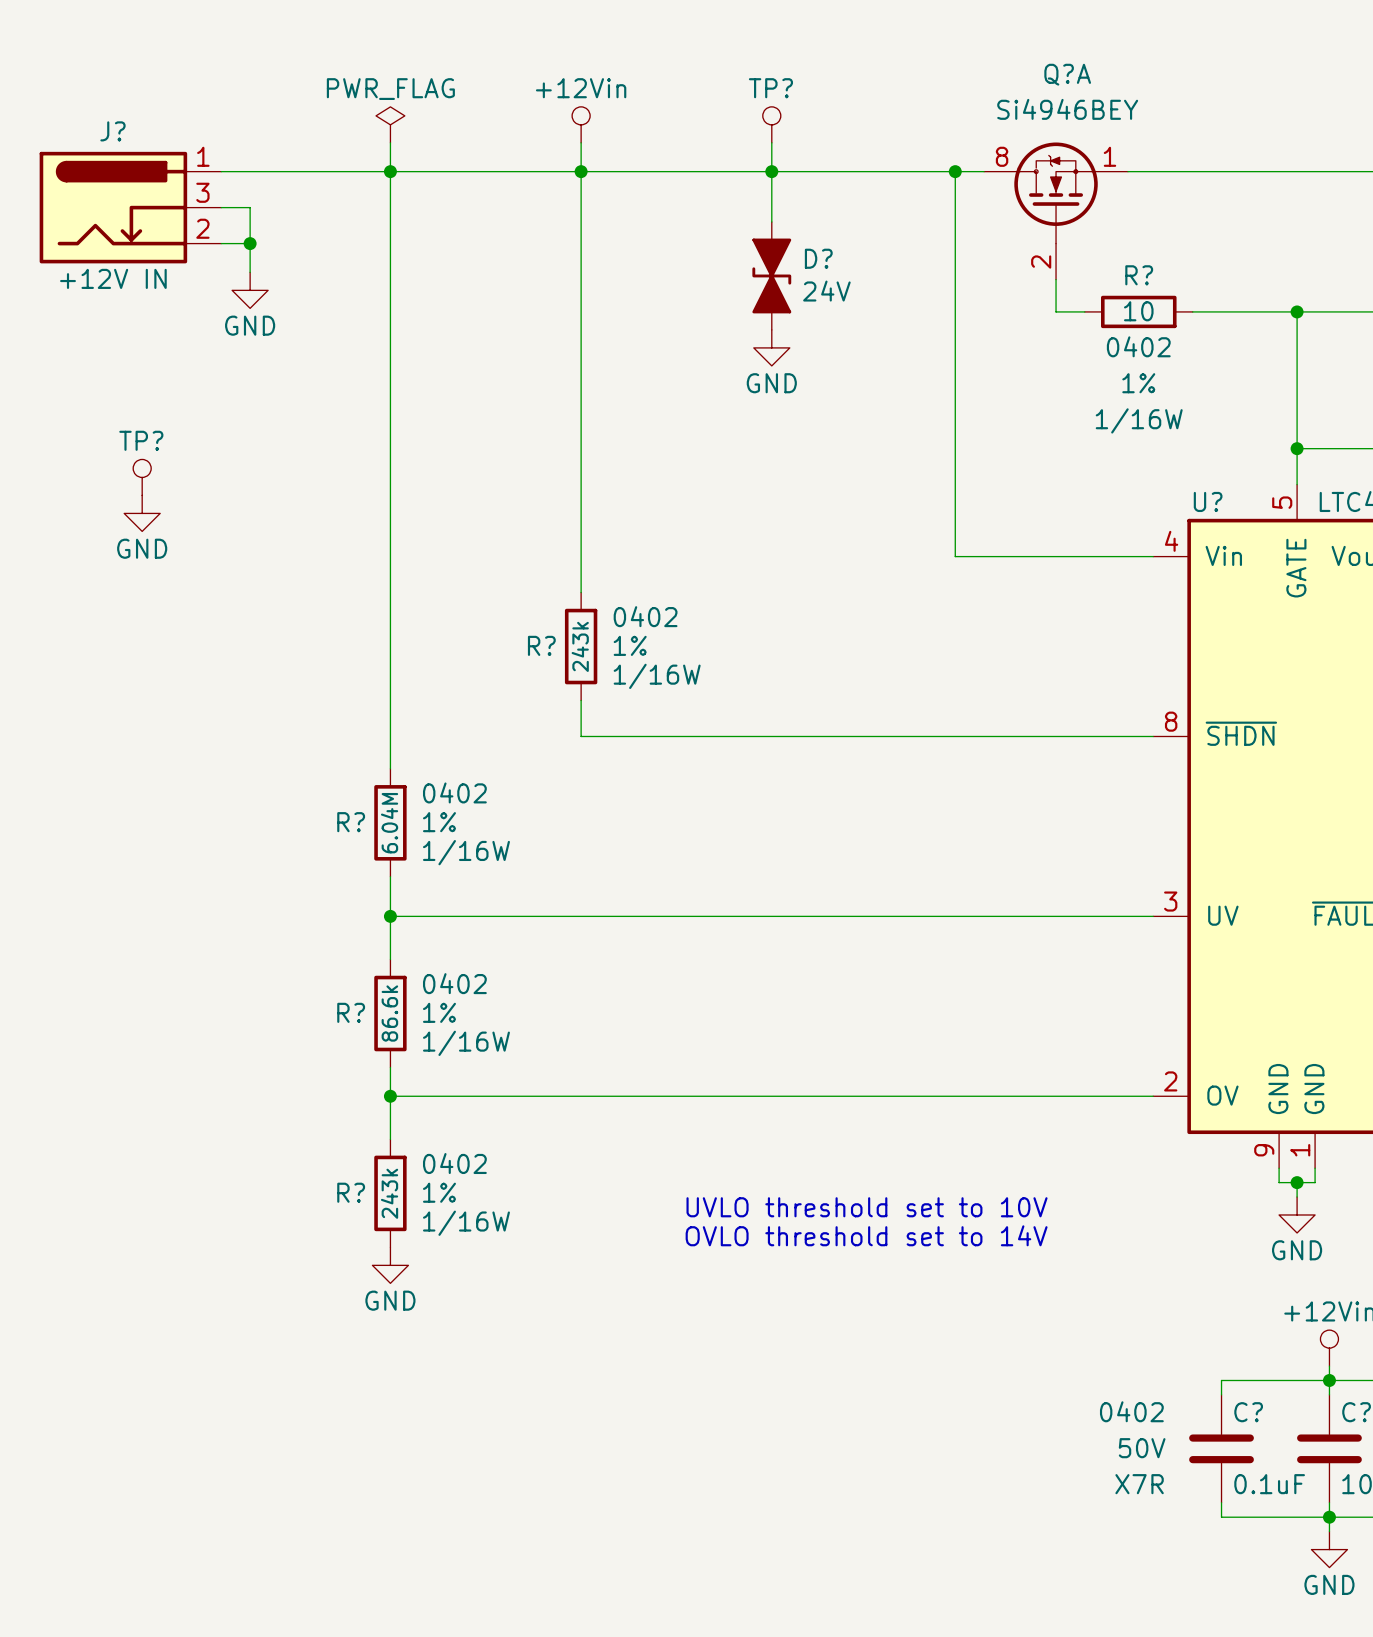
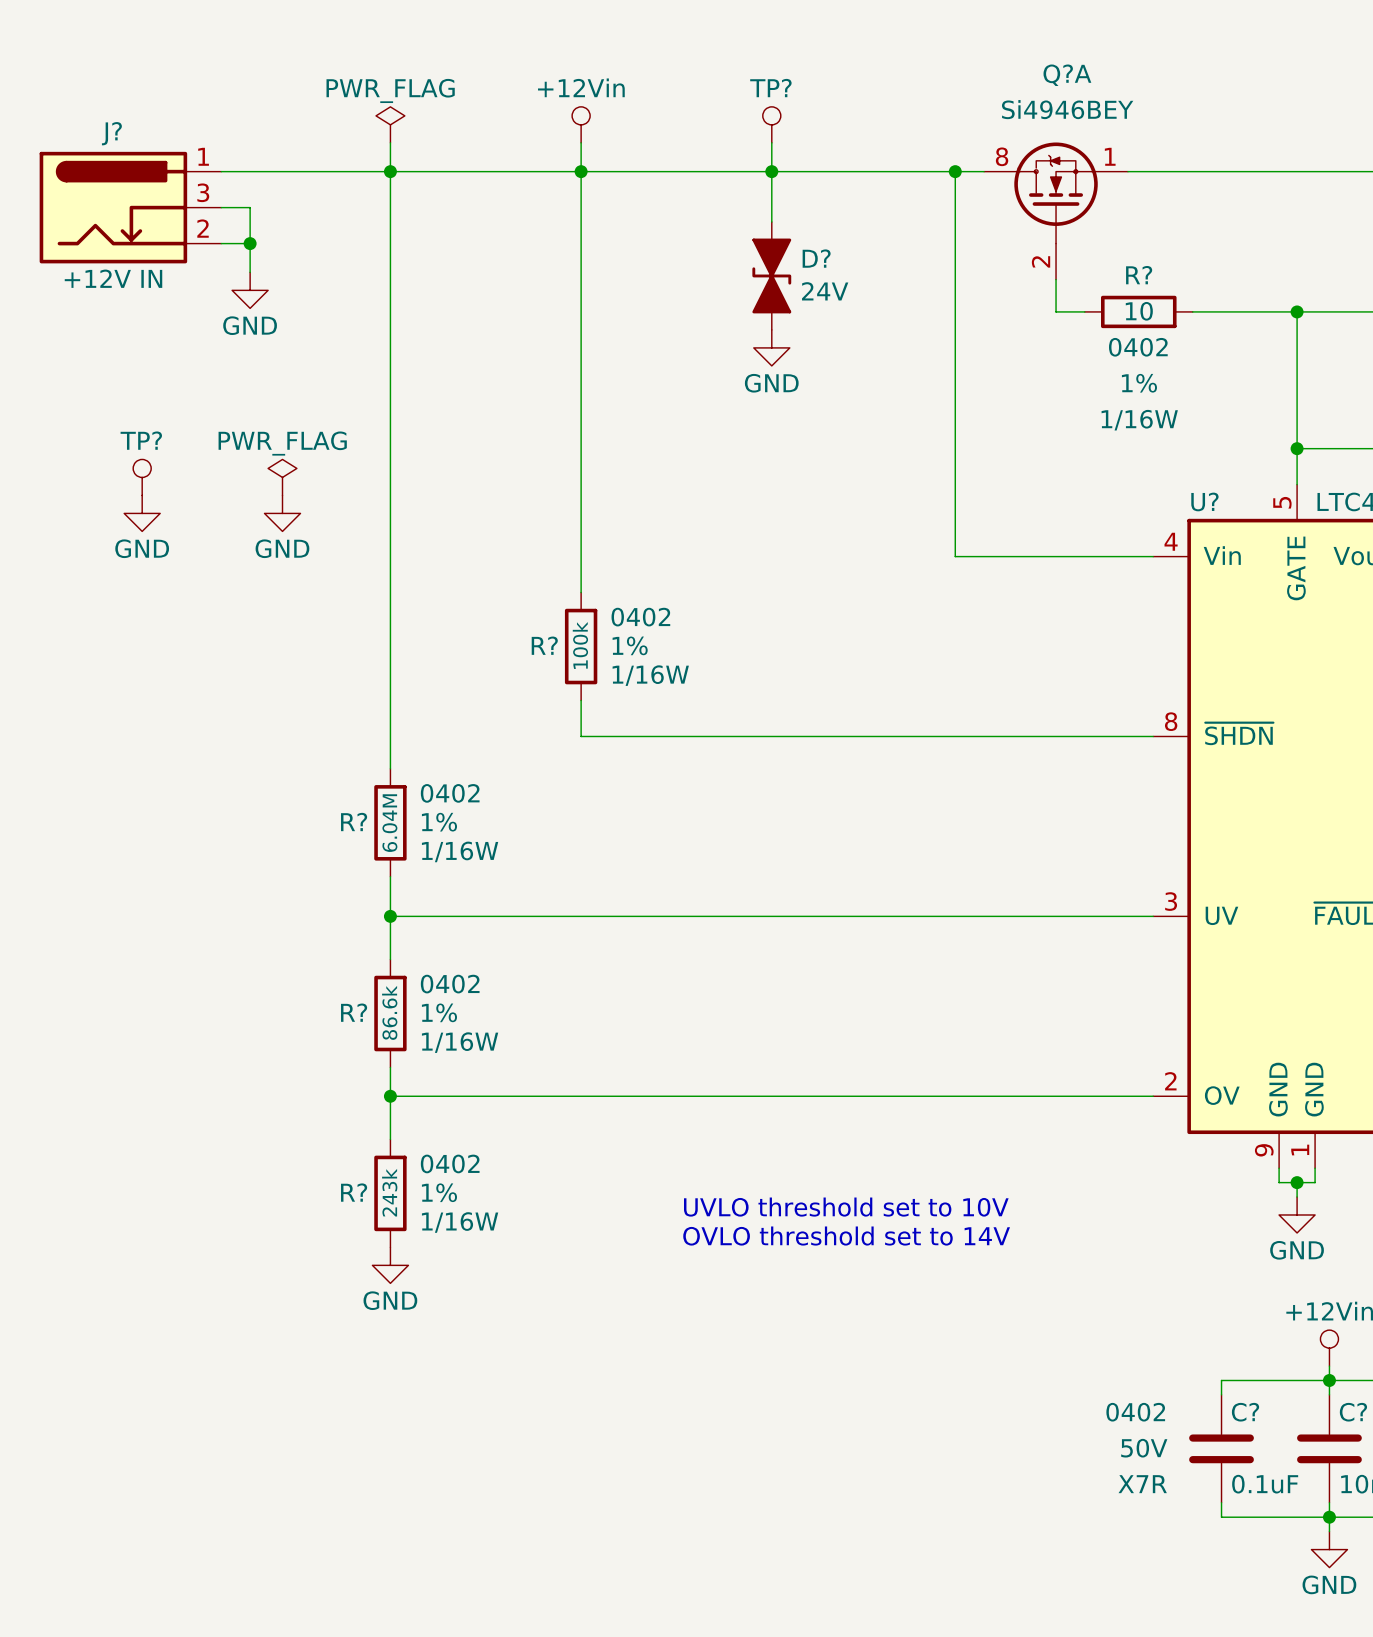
power symbol: none -> PWR_FLAG (282, 477)
power symbol: none -> GND (282, 513)
R? value: 243k (580, 646) -> 100k (580, 645)

